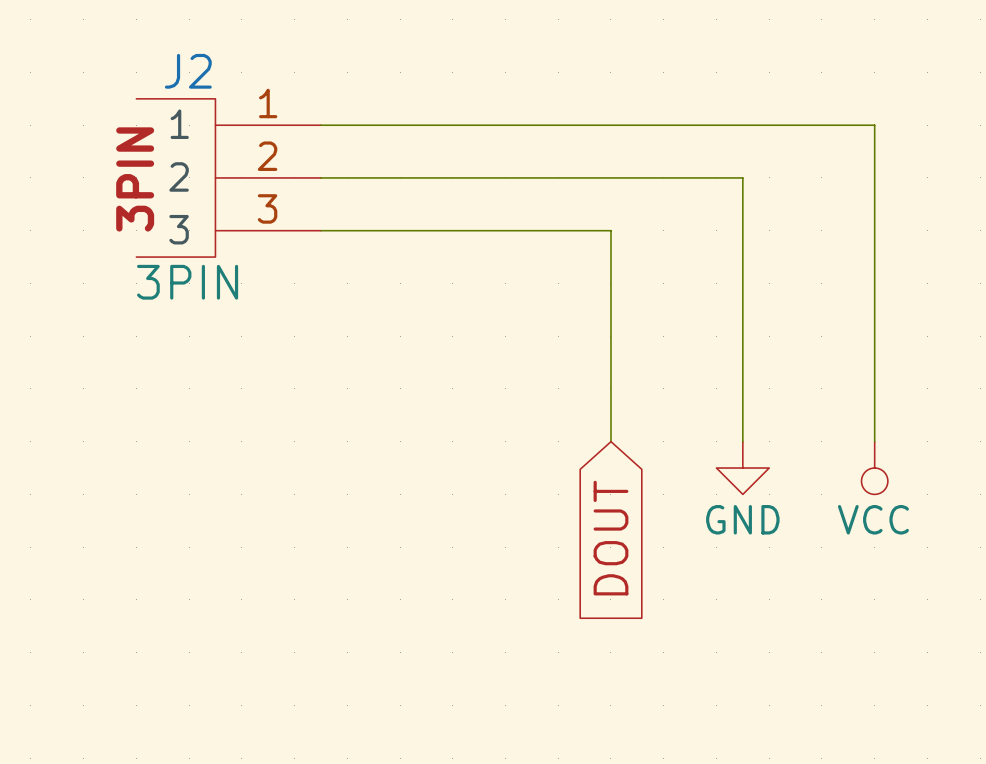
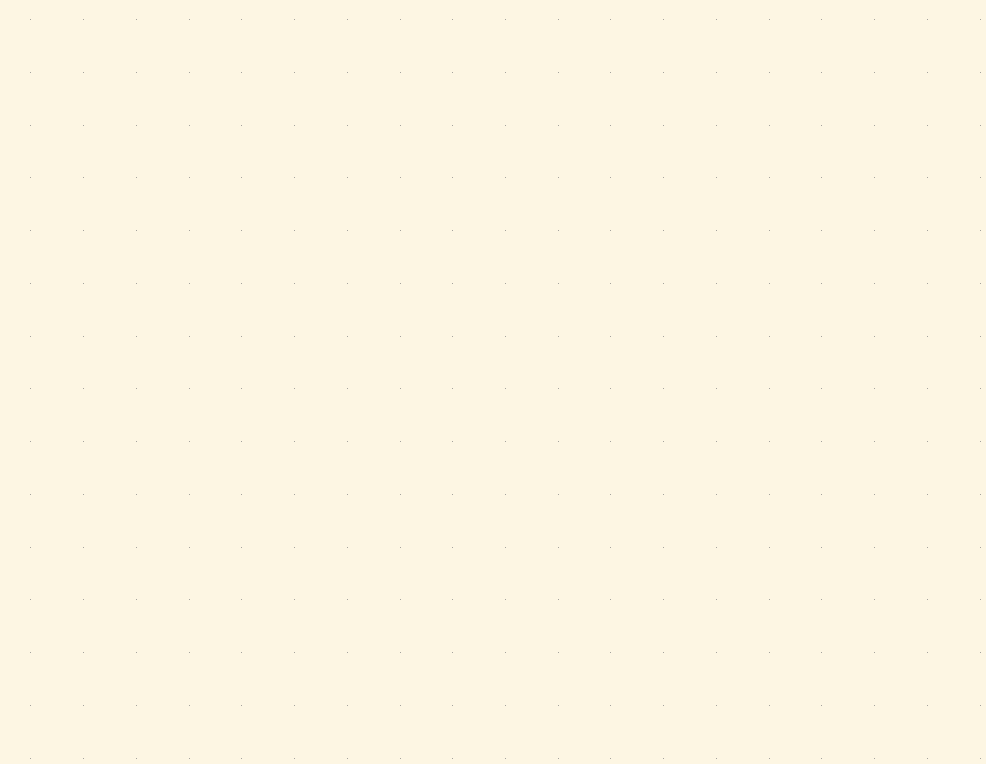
wire: (320, 125) (874, 125) (874, 441) -> none
J2: 3PIN (228, 177) -> none
wire: (320, 177) (742, 177) (742, 441) -> none
wire: (320, 230) (610, 230) (610, 441) -> none
power symbol: GND (742, 468) -> none
power symbol: VCC (874, 468) -> none
global label: DOUT (610, 538) -> none

